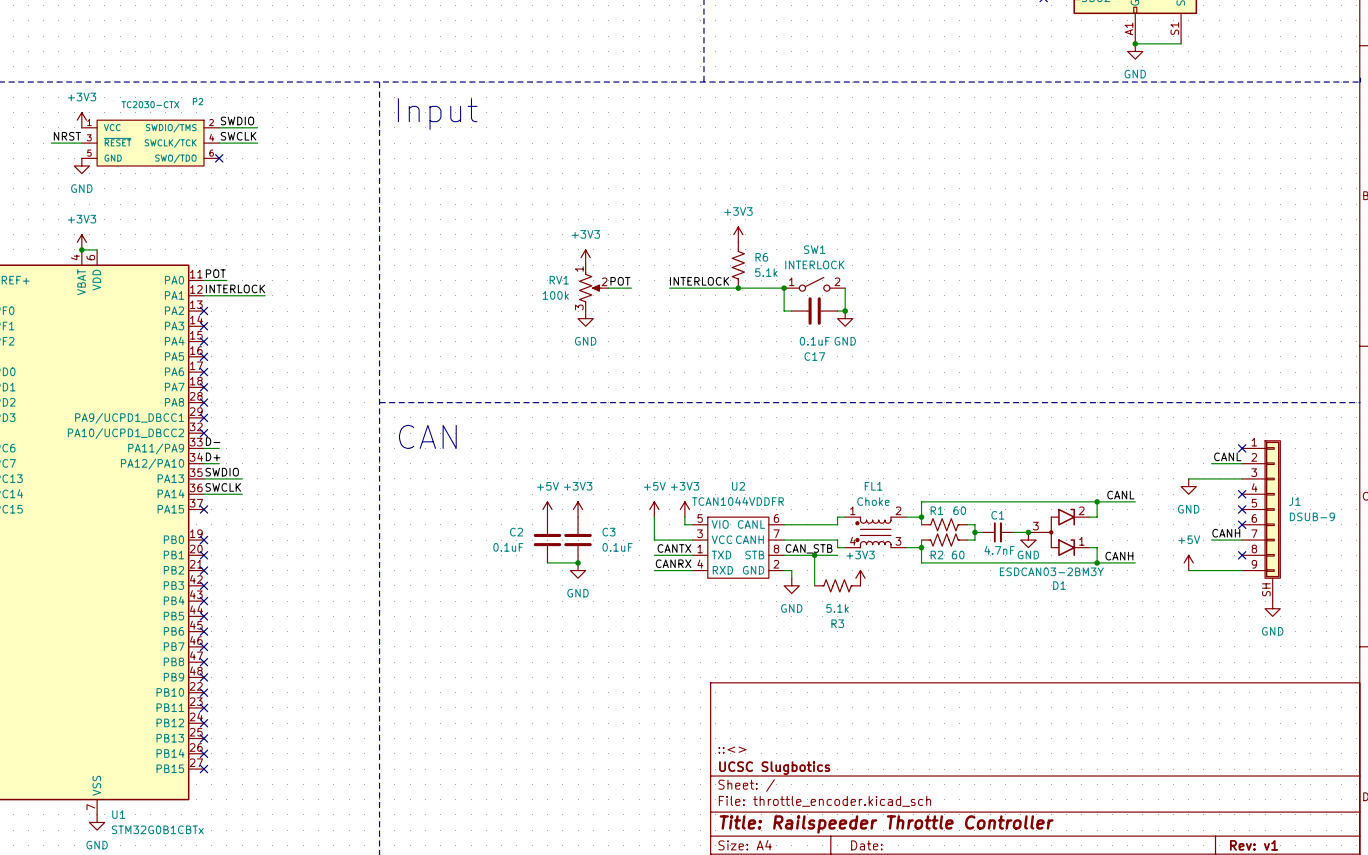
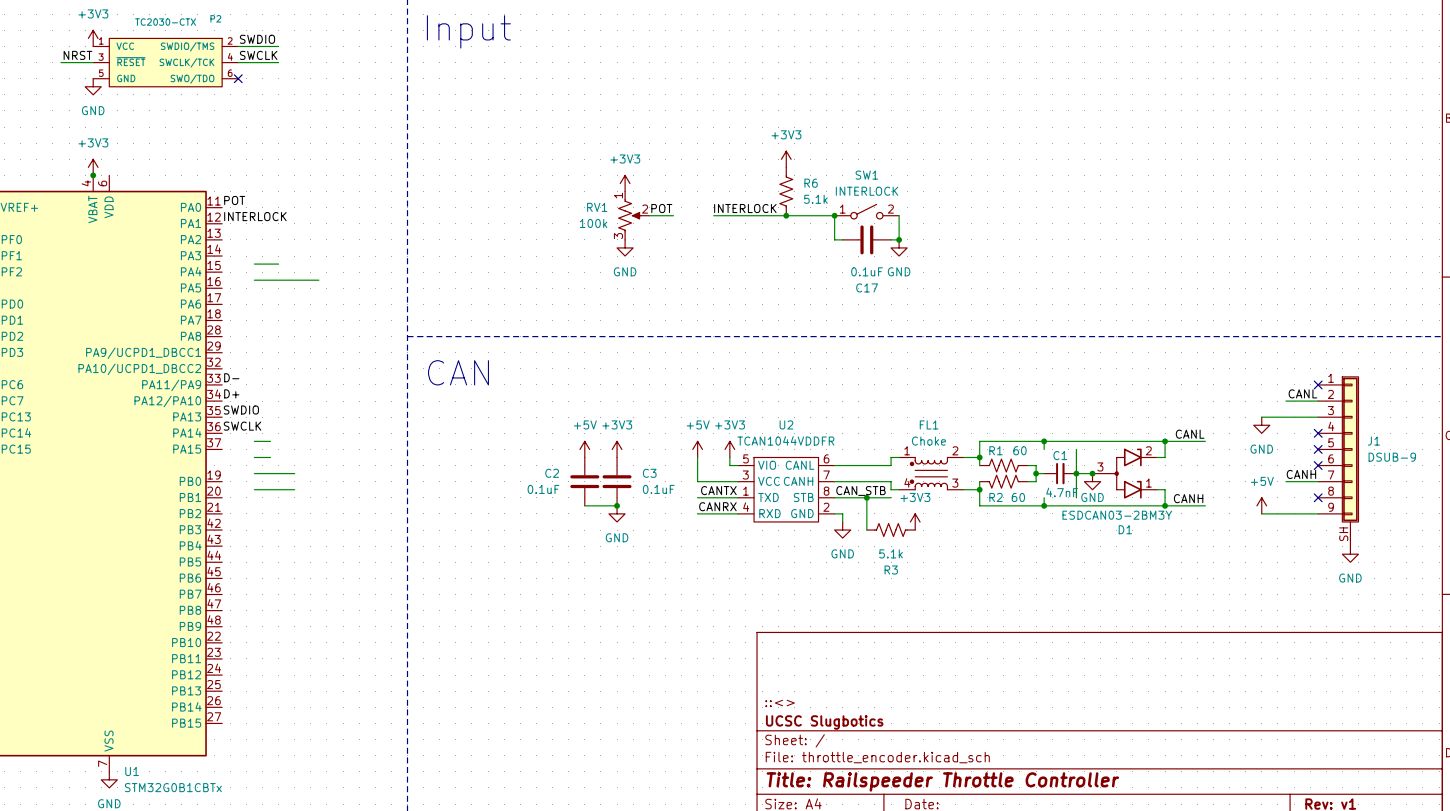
wire: (81, 249) (97, 249) -> none
wire: (203, 280) (226, 280) -> (254, 264) (278, 264)
wire: (203, 295) (265, 295) -> (254, 280) (318, 280)
no-connect mark: (203, 311) -> none
no-connect mark: (203, 326) -> none
no-connect mark: (203, 341) -> none
no-connect mark: (203, 356) -> none
no-connect mark: (203, 372) -> none
no-connect mark: (203, 387) -> none
no-connect mark: (203, 402) -> none
no-connect mark: (203, 417) -> none
no-connect mark: (203, 433) -> none
wire: (203, 448) (219, 448) -> (254, 441) (270, 441)
wire: (203, 463) (219, 463) -> (254, 457) (270, 457)
wire: (203, 478) (242, 478) -> (254, 473) (294, 473)
wire: (203, 494) (242, 494) -> (254, 489) (294, 489)
wire: none -> (1044, 441) (1044, 449)
junction: none -> (1044, 441)
no-connect mark: (203, 509) -> none
wire: none -> (1076, 449) (1076, 497)
junction: none -> (1076, 473)
no-connect mark: (203, 540) -> none
no-connect mark: (203, 555) -> none
wire: none -> (1044, 497) (1044, 505)
junction: none -> (1044, 505)
no-connect mark: (203, 570) -> none
no-connect mark: (203, 585) -> none
no-connect mark: (203, 601) -> none
no-connect mark: (203, 616) -> none
no-connect mark: (203, 631) -> none
no-connect mark: (203, 646) -> none
no-connect mark: (203, 662) -> none
no-connect mark: (203, 677) -> none
no-connect mark: (203, 692) -> none
no-connect mark: (203, 707) -> none
no-connect mark: (203, 723) -> none
no-connect mark: (203, 738) -> none
no-connect mark: (203, 753) -> none
no-connect mark: (203, 769) -> none

